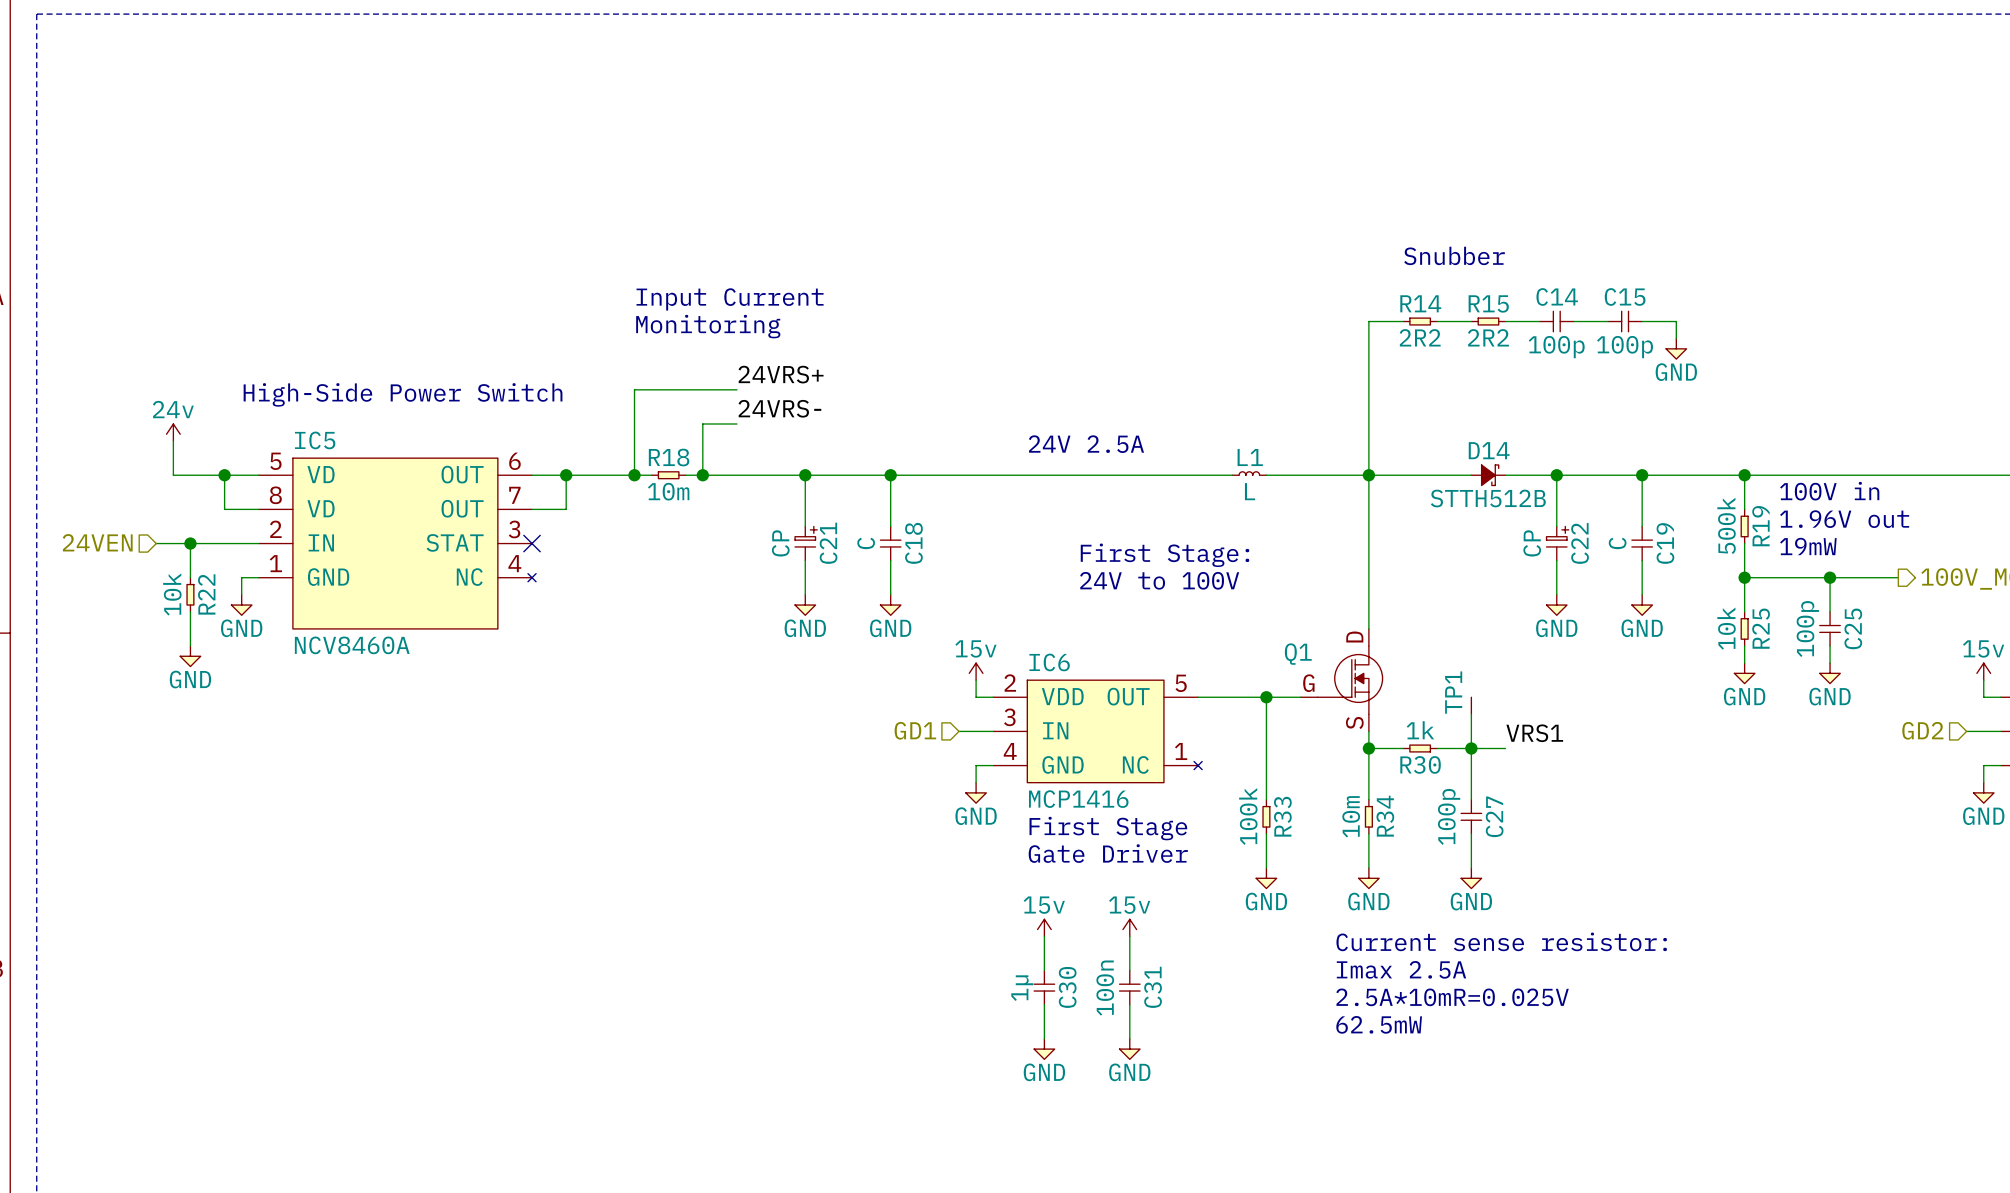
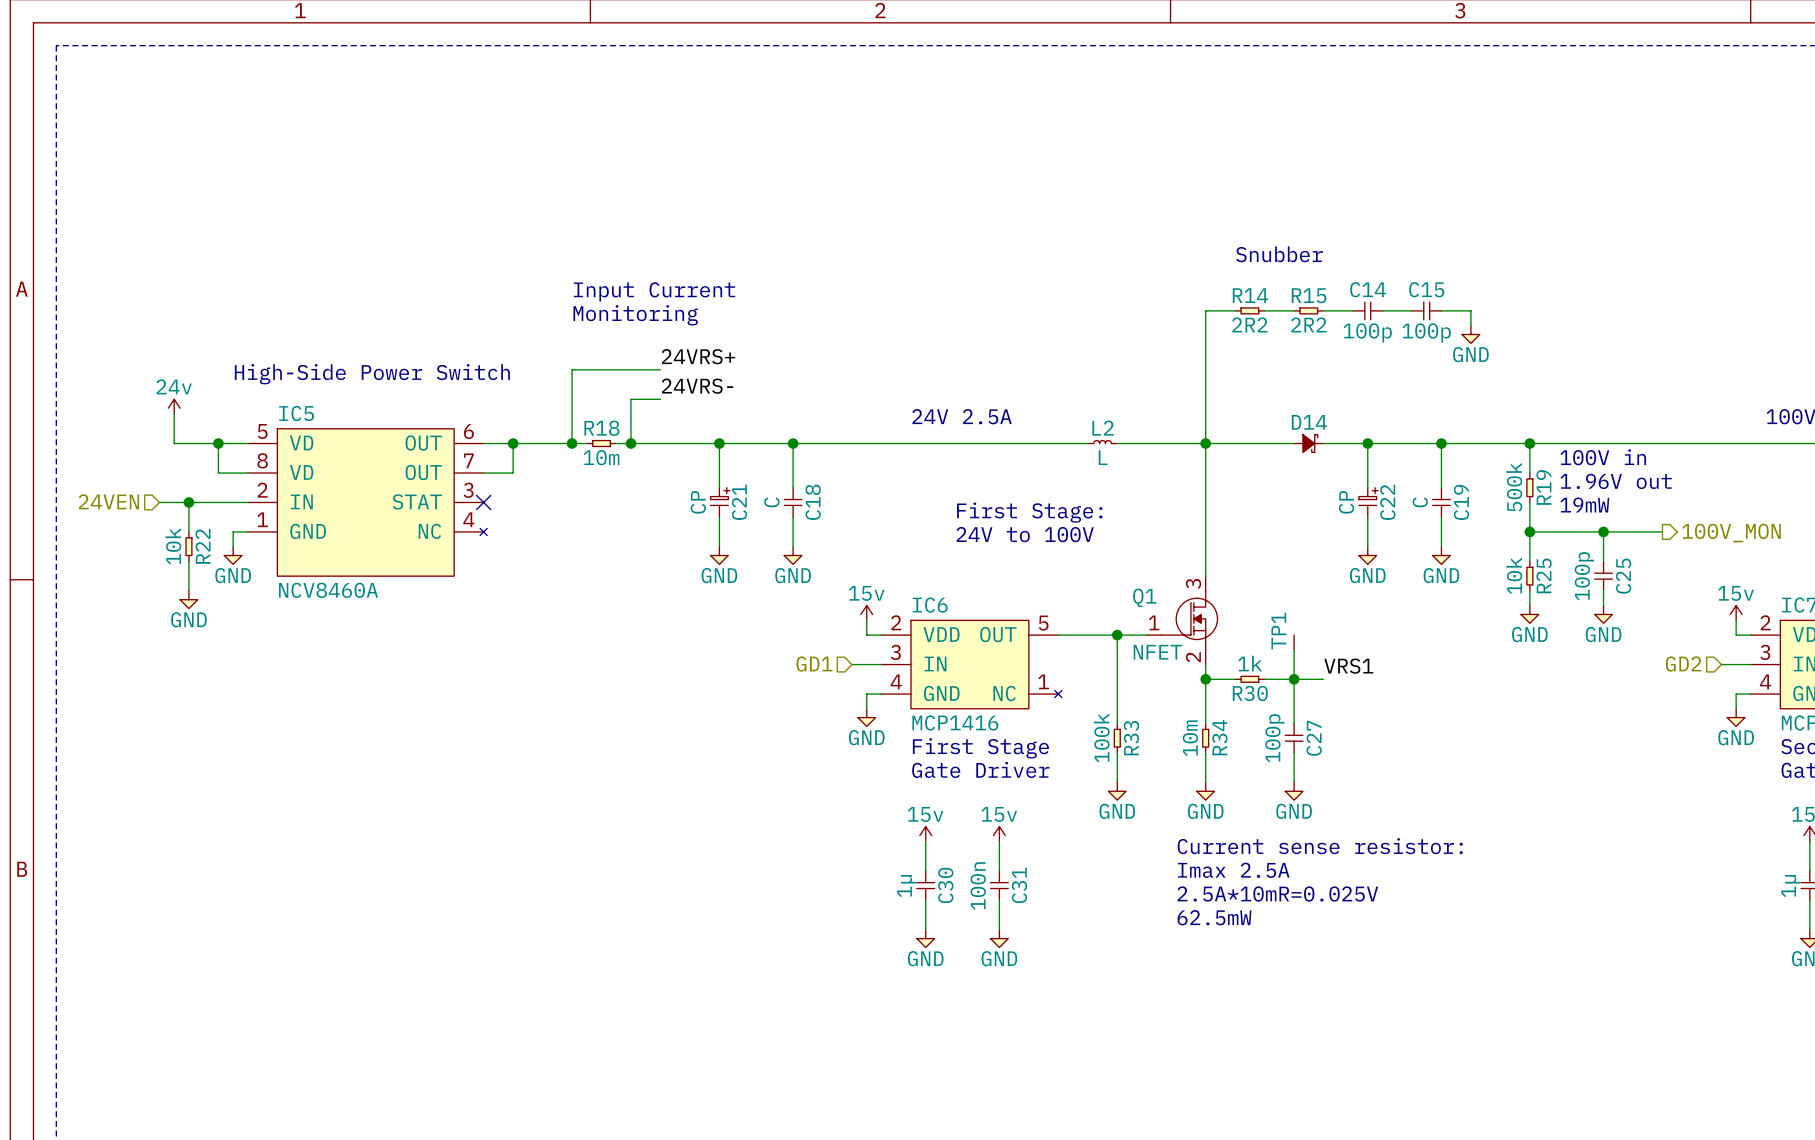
L1 name: L1 (1250, 457) -> L2 (1103, 428)
D14 value: STTH512B (1488, 498) -> none
Q1 pin number: D (1354, 637) -> 3 (1193, 583)
Q1 pin number: G (1308, 683) -> 1 (1154, 622)
Q1 value: none -> NFET (1157, 652)
Q1 pin number: S (1354, 723) -> 2 (1193, 657)

